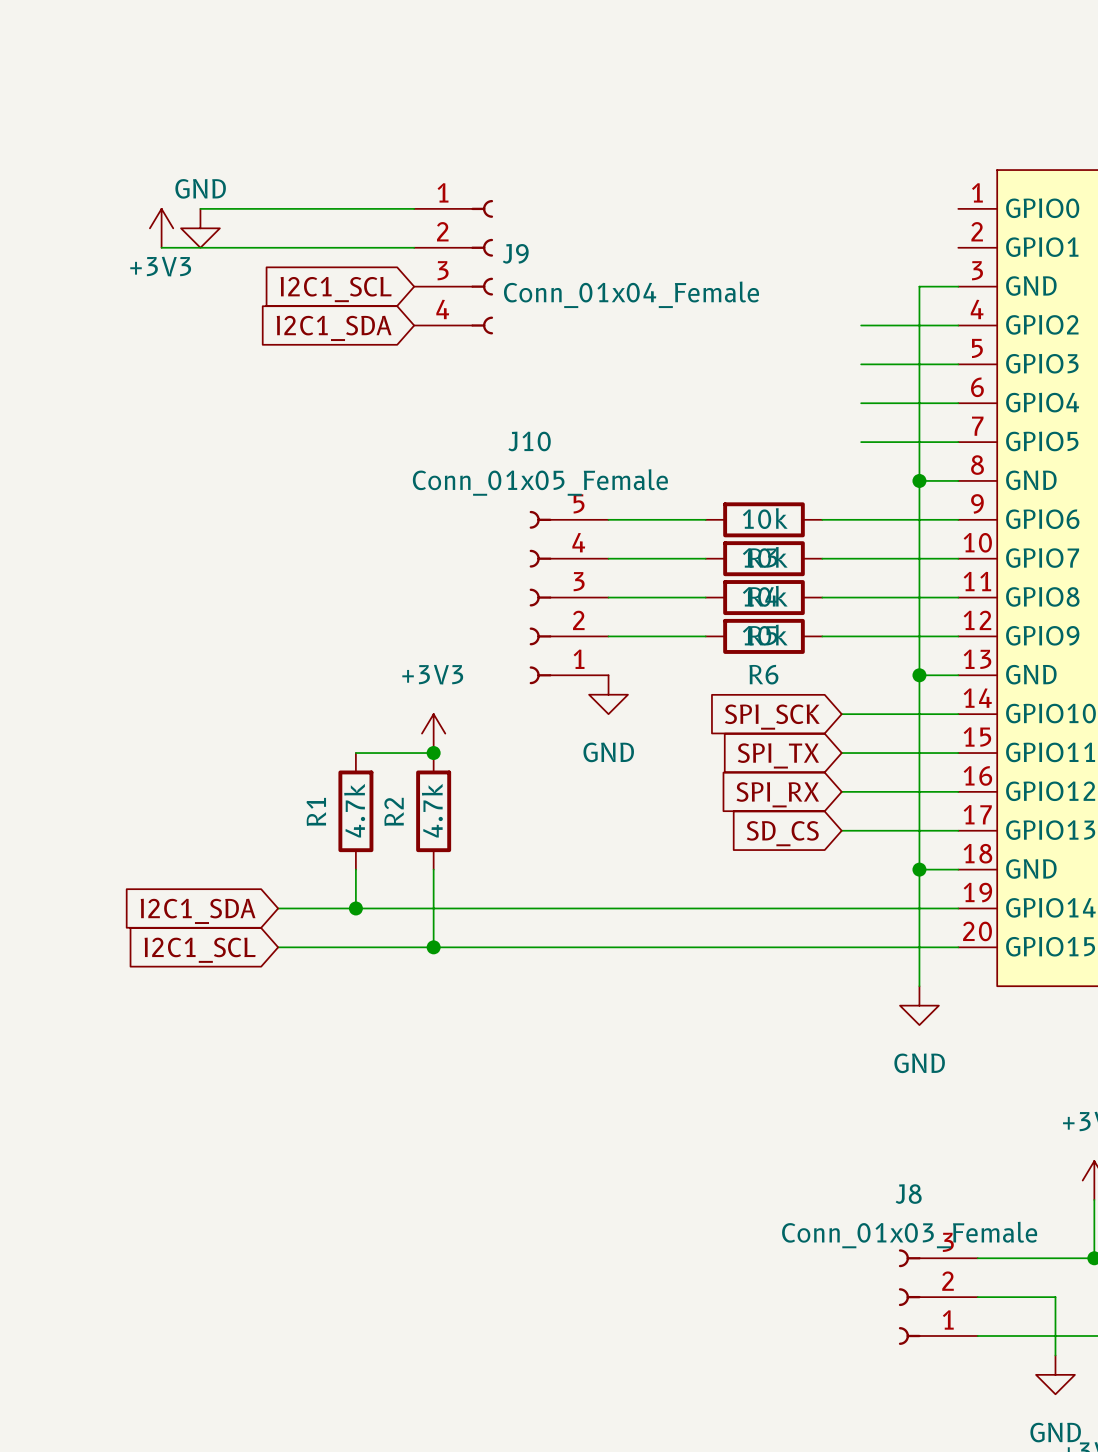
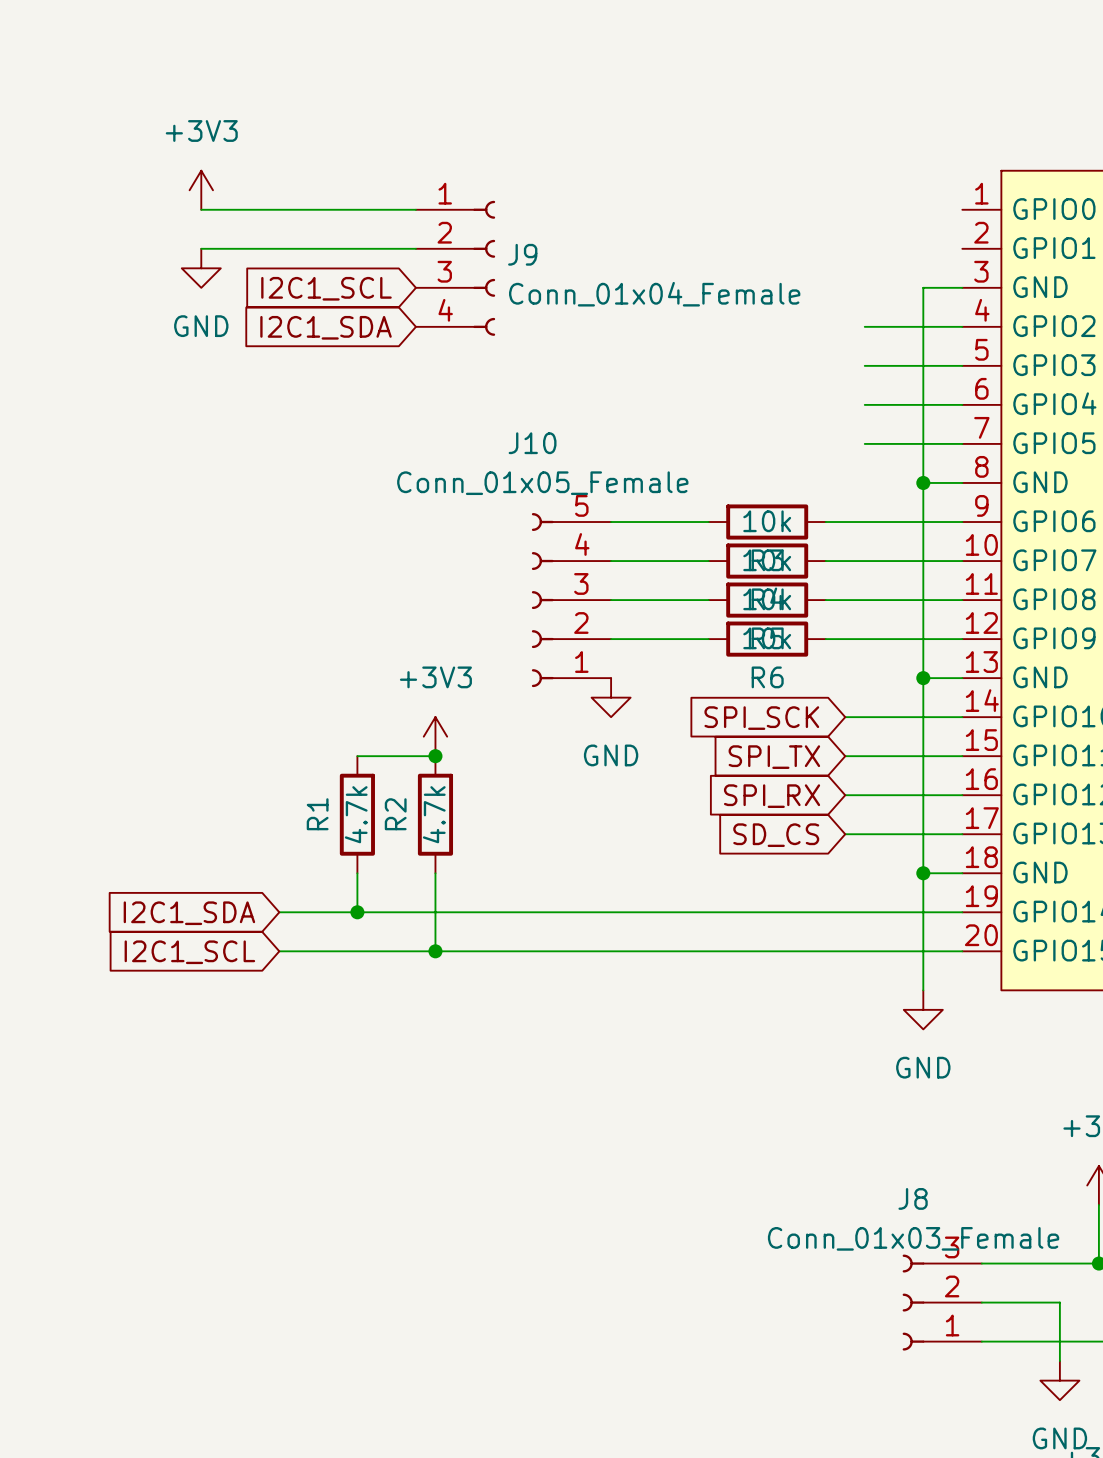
power symbol text position: GND (200, 188) -> GND (201, 326)
power symbol position: +3V3 (161, 228) -> +3V3 (201, 190)
power symbol position: GND (200, 228) -> GND (201, 268)
wire: (161, 247) (200, 247) -> none
power symbol text position: +3V3 (160, 266) -> +3V3 (201, 130)

